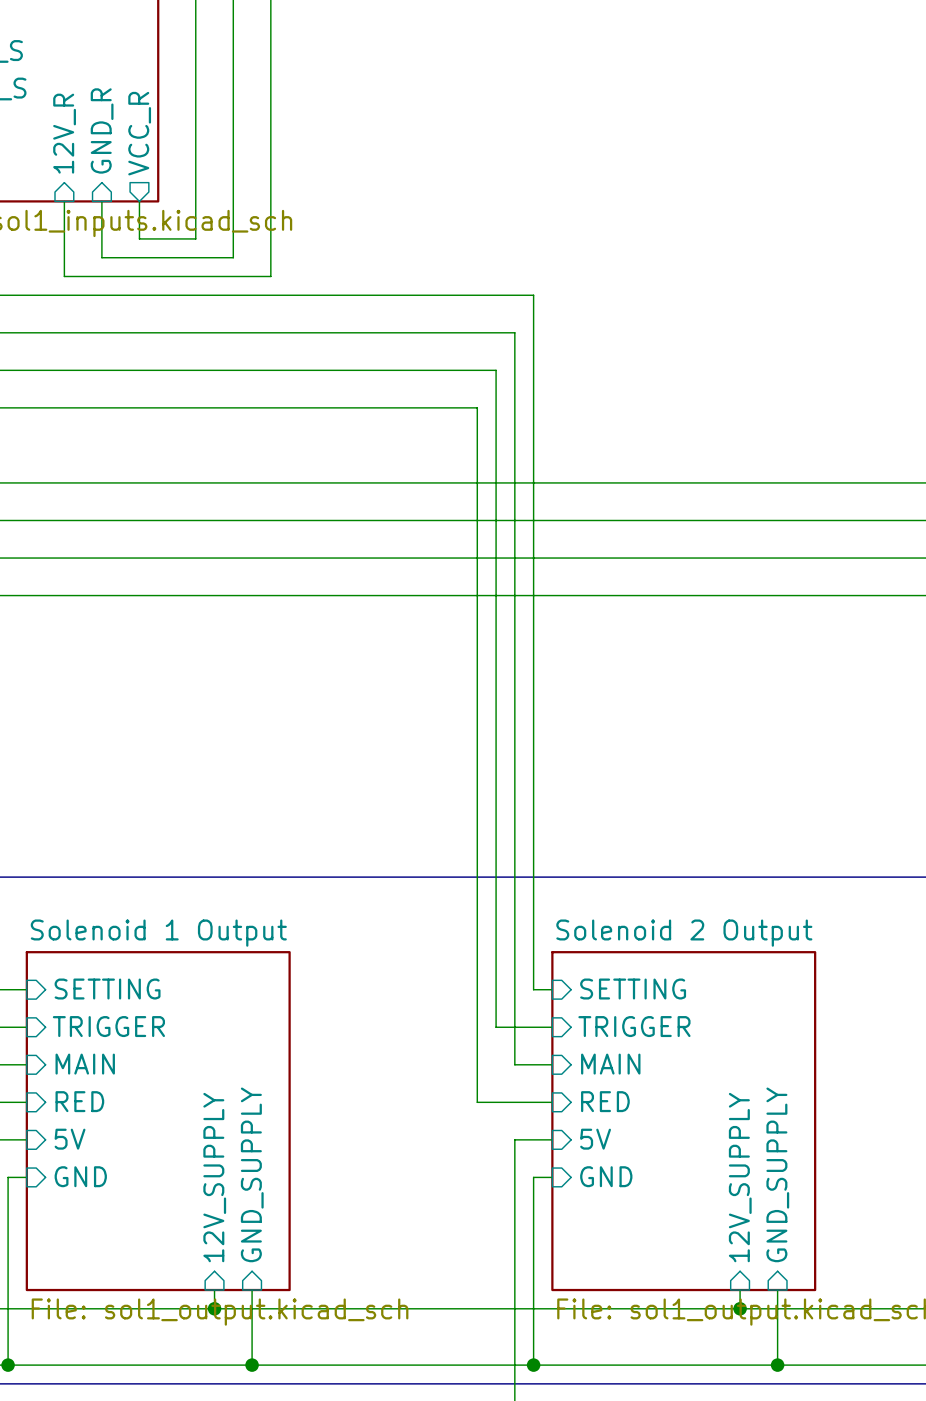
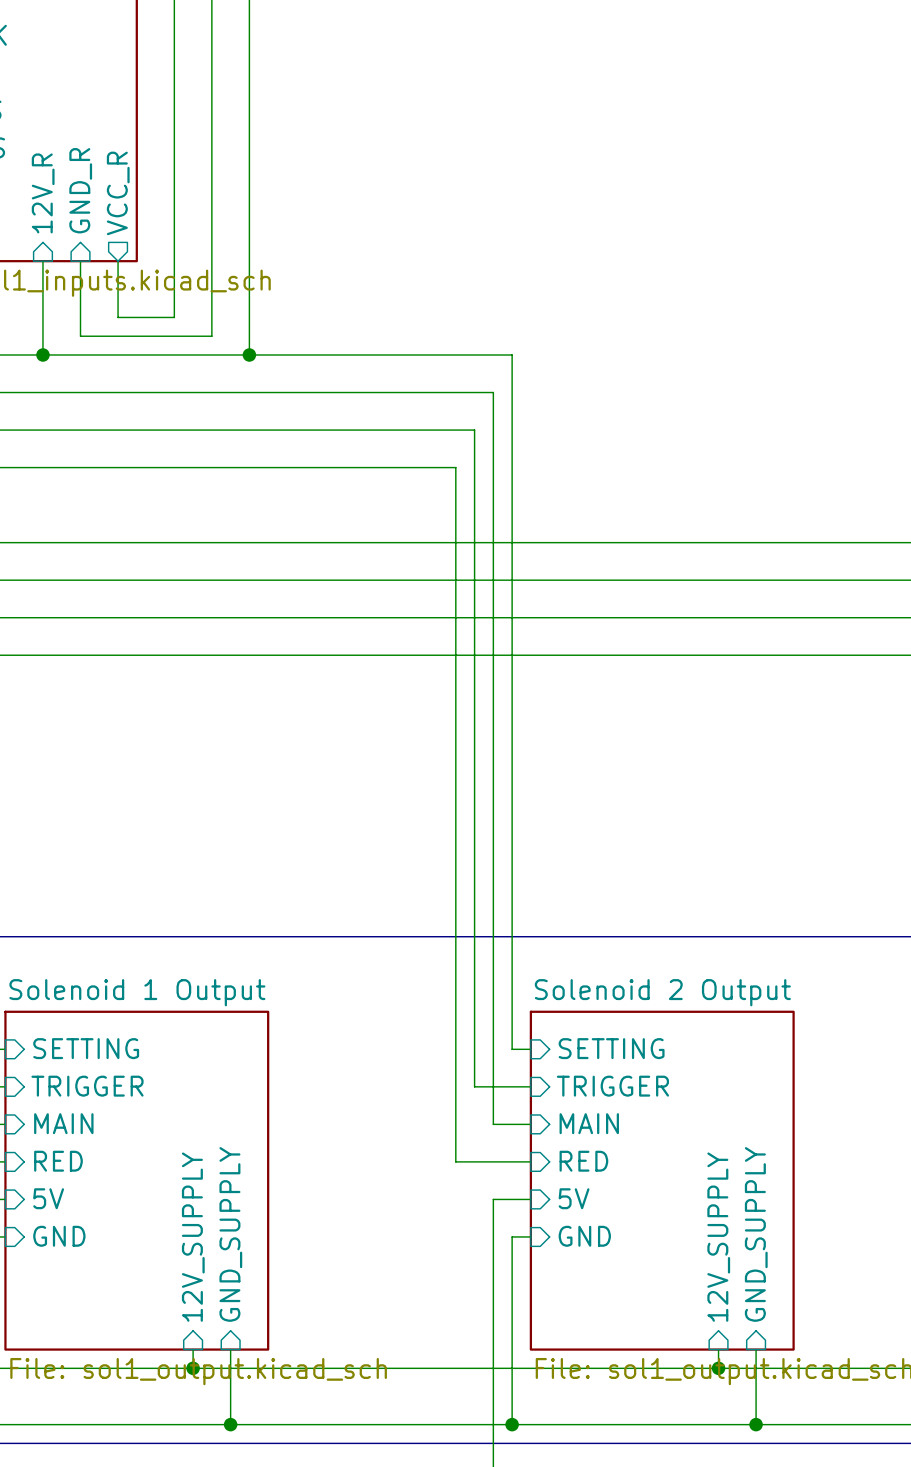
wire: (139, 238) (195, 238) -> (118, 298) (118, 317)
wire: (101, 257) (139, 257) -> (80, 317) (80, 336)
wire: (195, 257) (233, 257) -> (174, 317) (174, 298)
wire: (64, 276) (101, 276) -> (42, 336) (42, 354)
wire: (233, 276) (270, 276) -> (211, 336) (211, 317)
wire: none -> (249, 336) (249, 354)
junction: none -> (42, 354)
junction: none -> (249, 354)

